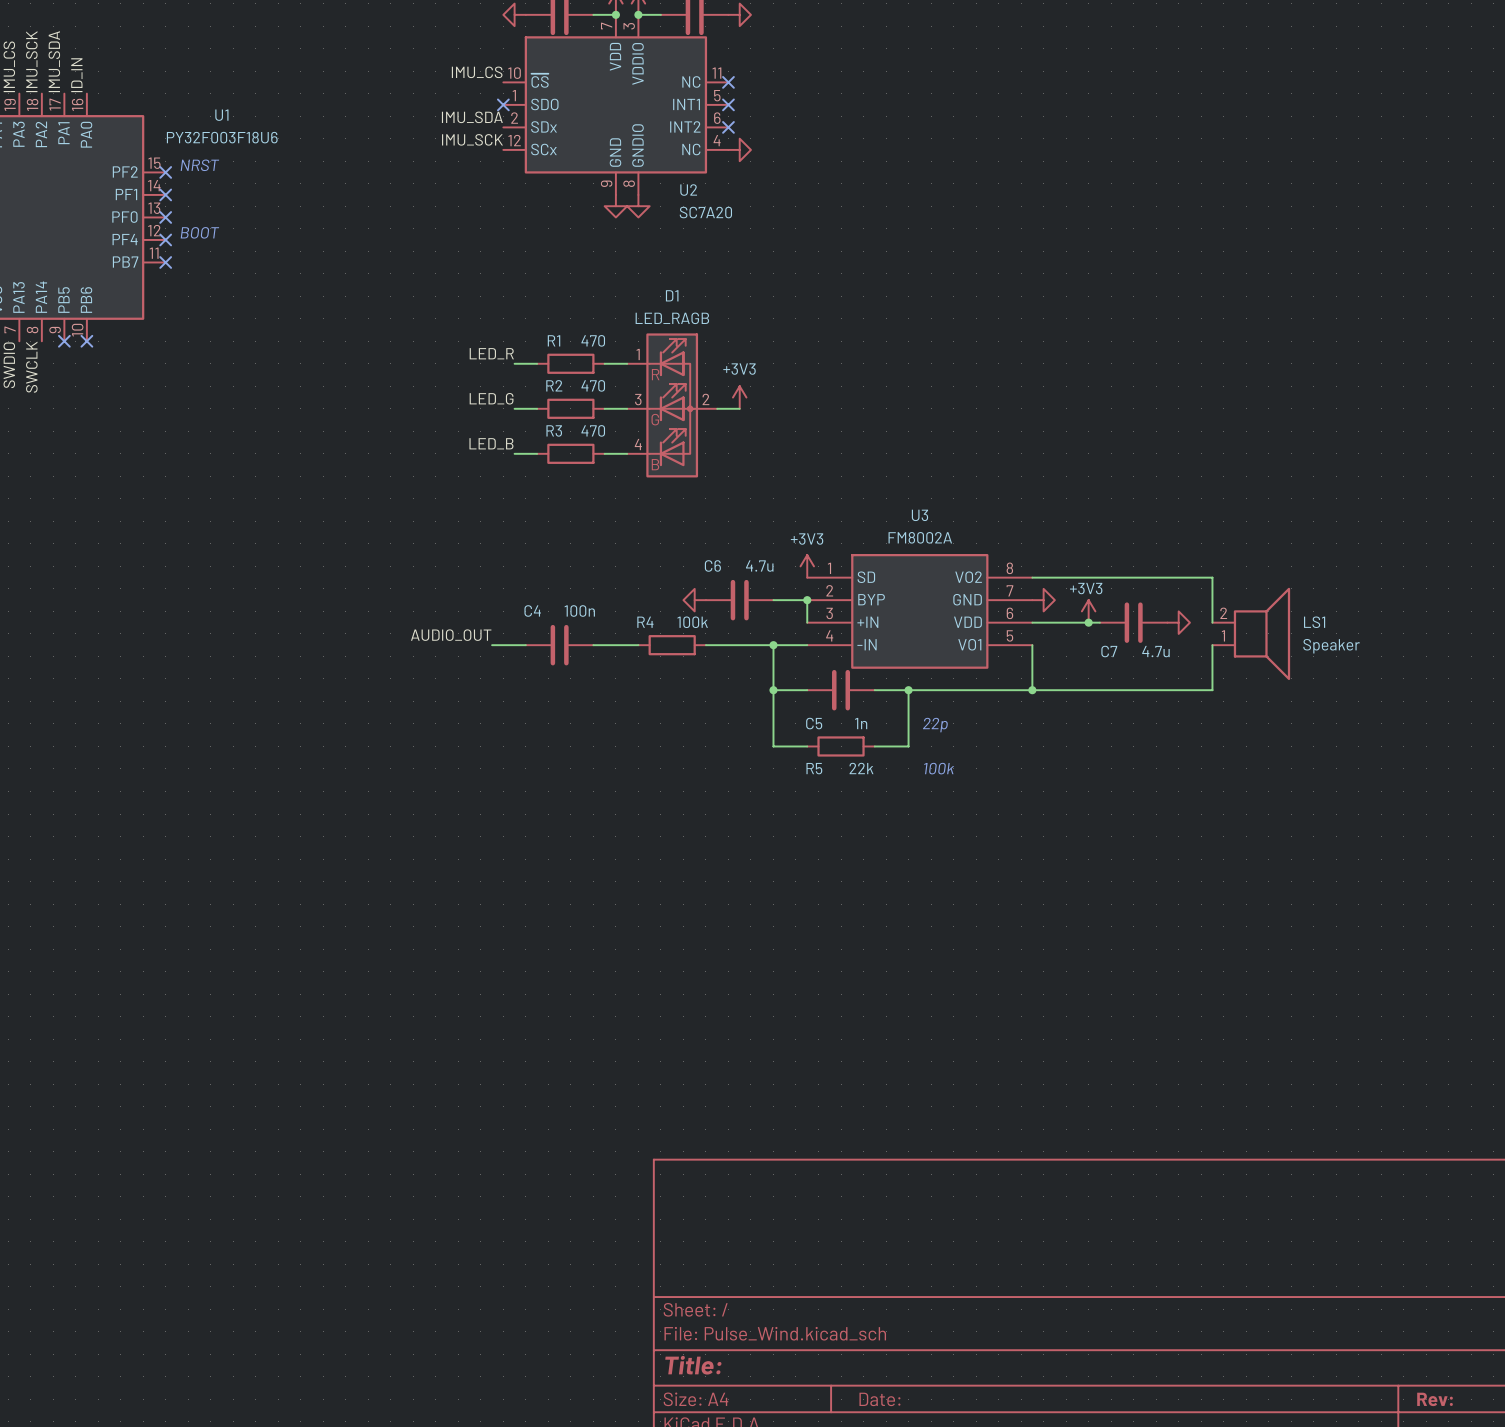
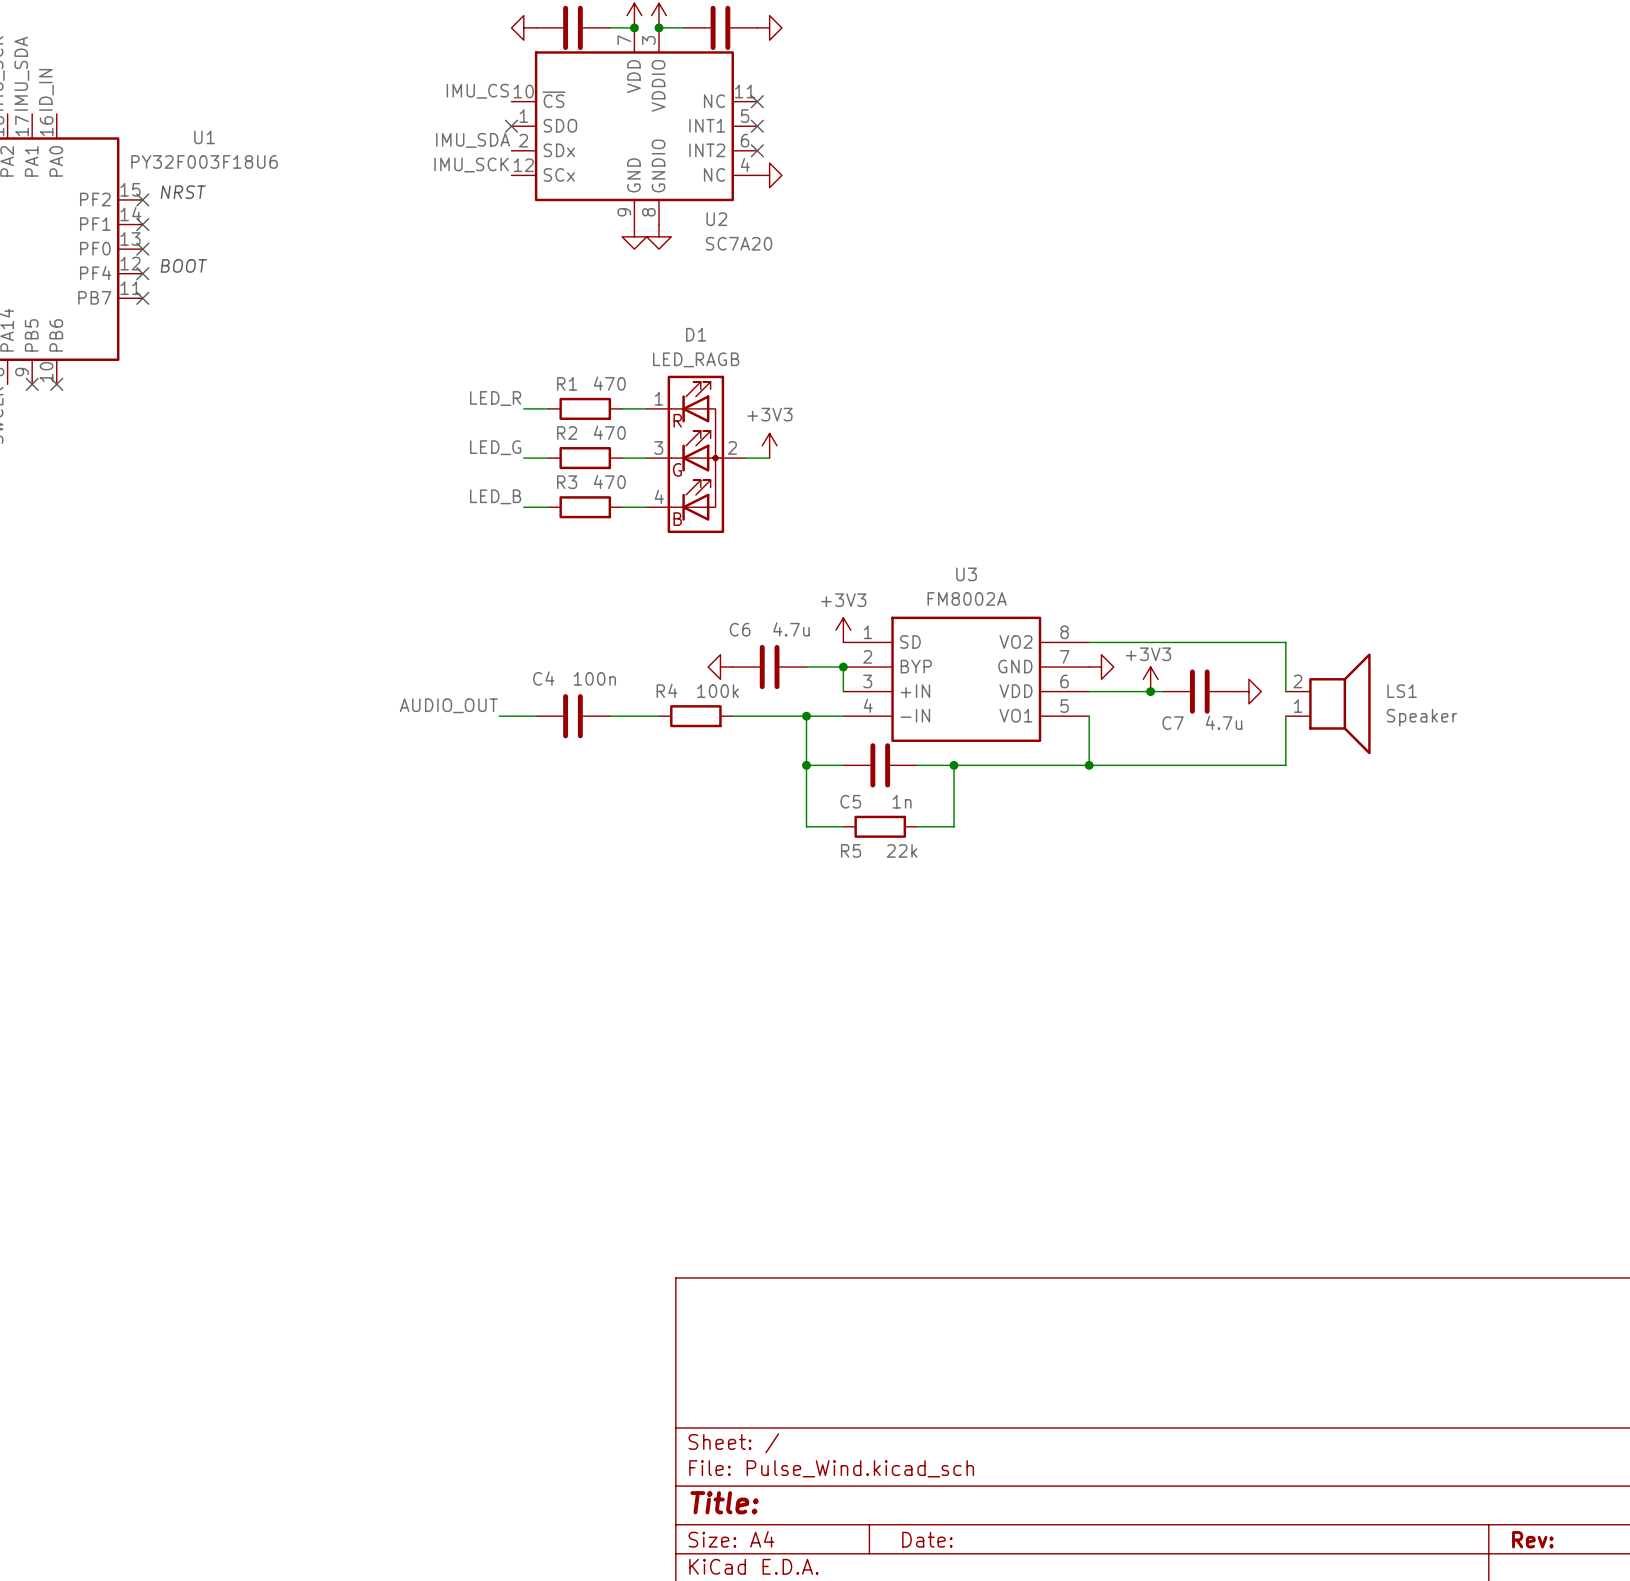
text: 22p (935, 725) -> none
text: 100k (939, 768) -> none

